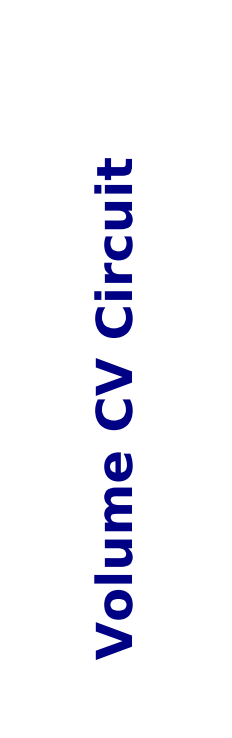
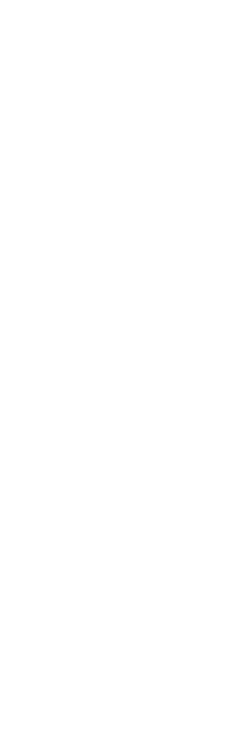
text: Volume CV Circuit (113, 409) -> none

